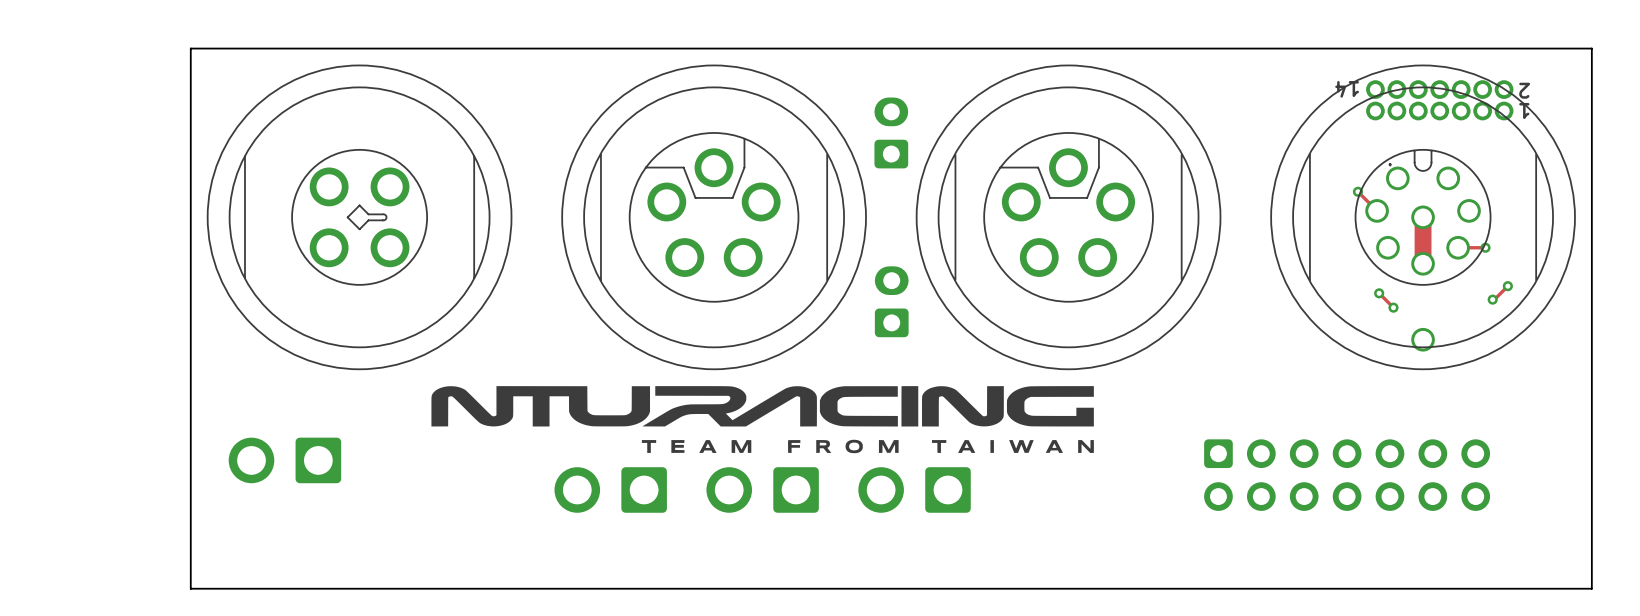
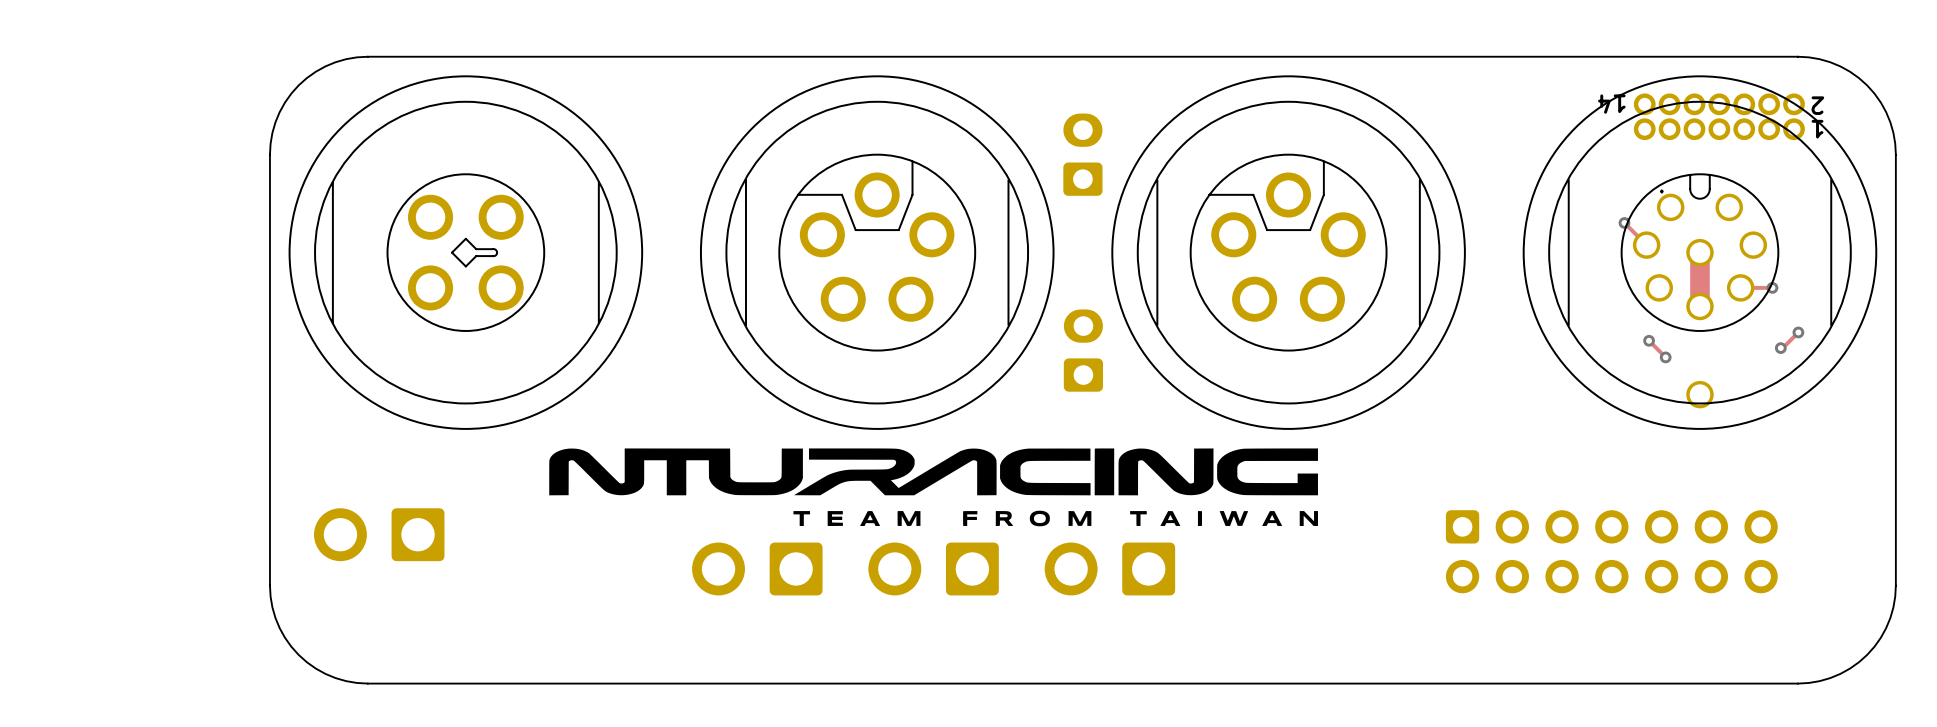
board edge: (275, 48) (190, 48) (190, 132) -> (367, 56) (346, 59) (325, 66) (298, 85) (284, 102) (275, 122) (269, 154)
board edge: (1507, 48) (1591, 48) (1591, 132) -> (1797, 56) (1819, 59) (1840, 66) (1867, 85) (1886, 112) (1893, 132) (1895, 154)
board edge: (190, 504) (190, 588) (275, 588) -> (269, 585) (275, 617) (284, 637) (298, 654) (325, 673) (346, 681) (367, 683)
board edge: (1591, 504) (1591, 588) (1507, 588) -> (1895, 585) (1890, 617) (1880, 637) (1867, 654) (1850, 668) (1830, 678) (1797, 683)

